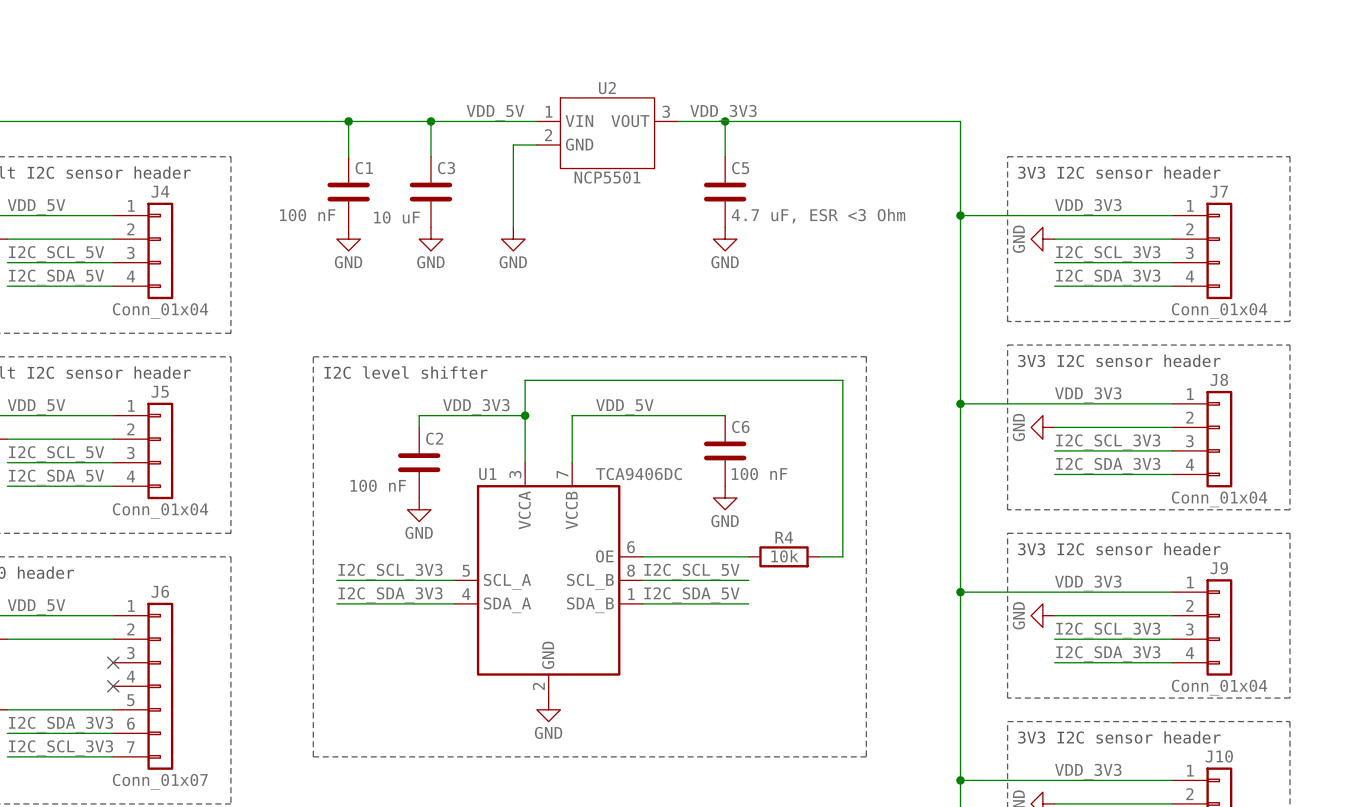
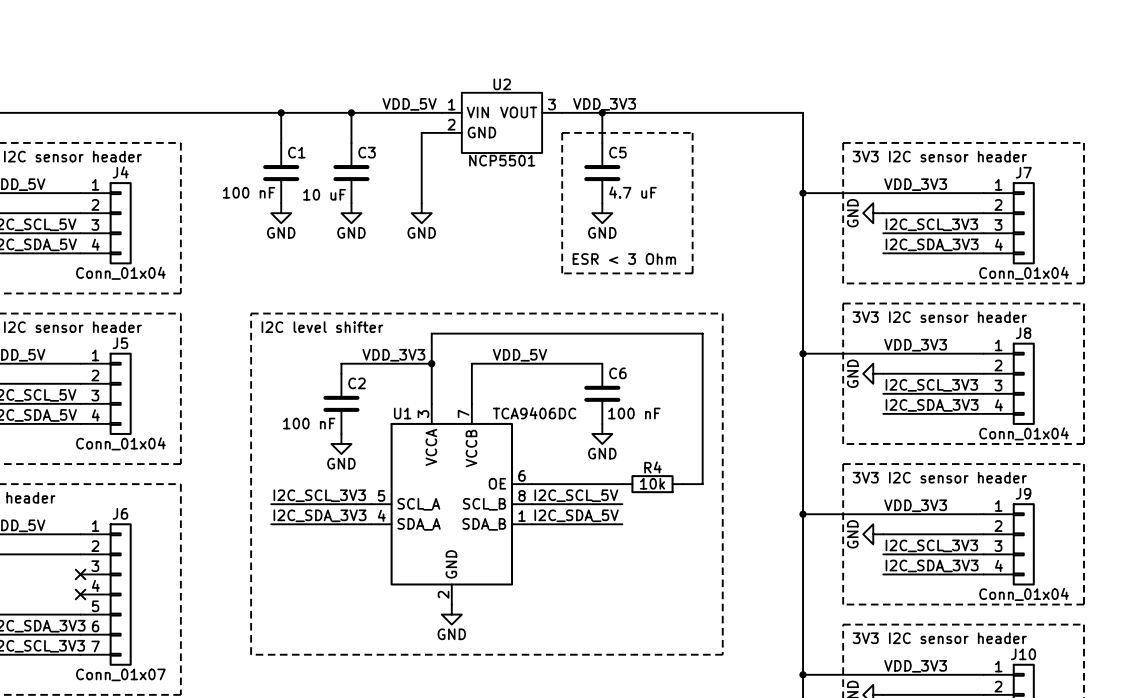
line: none -> (562, 132) (692, 132) (692, 273) (562, 273) (562, 132)
C5 value: 4.7 uF, ESR <3 Ohm (818, 216) -> 4.7 uF (632, 192)
text: none -> ESR < 3 Ohm (624, 259)

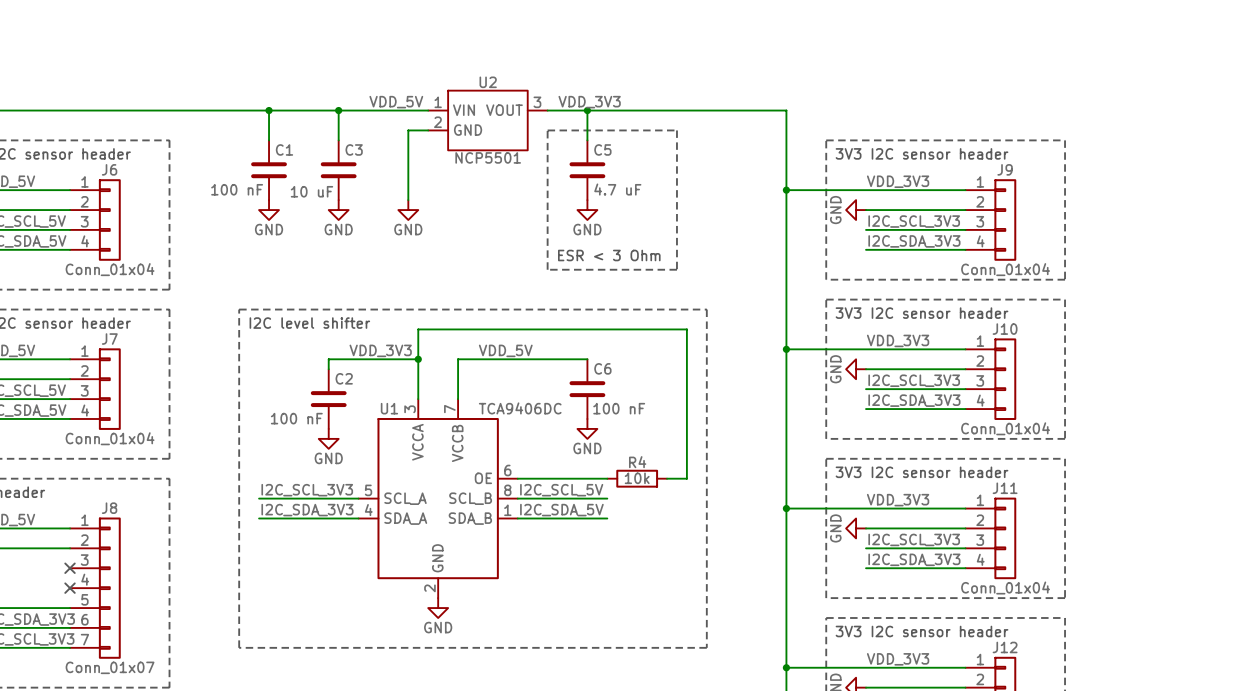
J4 name: J4 (120, 172) -> J6 (109, 169)
J7 name: J7 (1023, 172) -> J9 (1005, 169)
J8 name: J8 (1023, 333) -> J10 (1005, 329)
J5 name: J5 (120, 343) -> J7 (109, 339)
J9 name: J9 (1023, 493) -> J11 (1005, 488)
J6 name: J6 (120, 513) -> J8 (109, 508)
J10 name: J10 (1023, 654) -> J12 (1005, 647)

